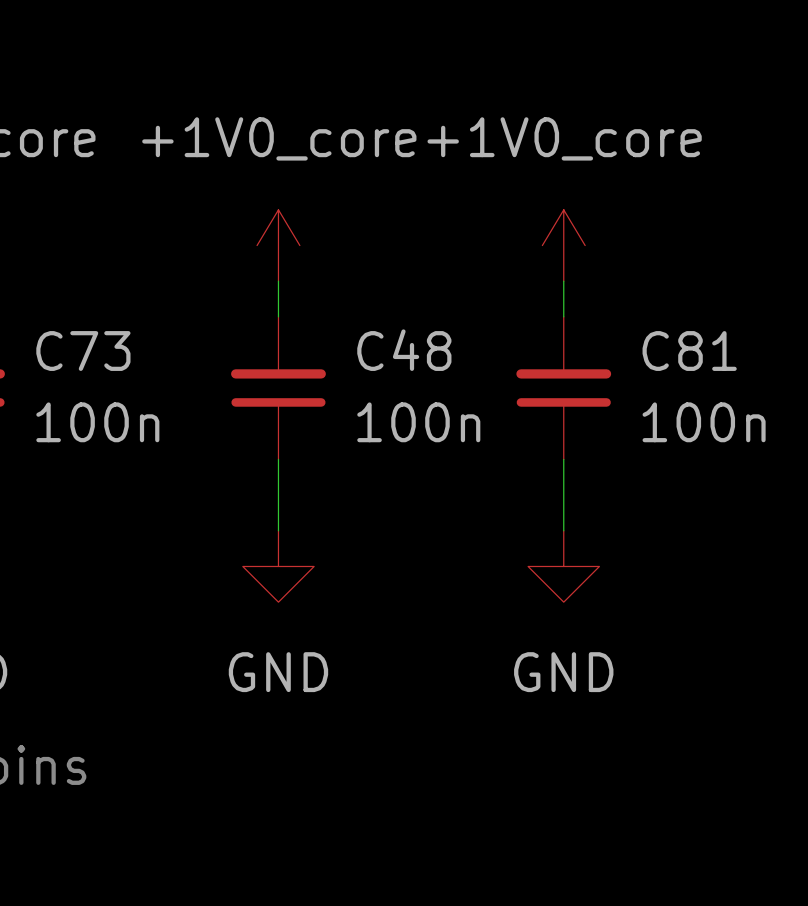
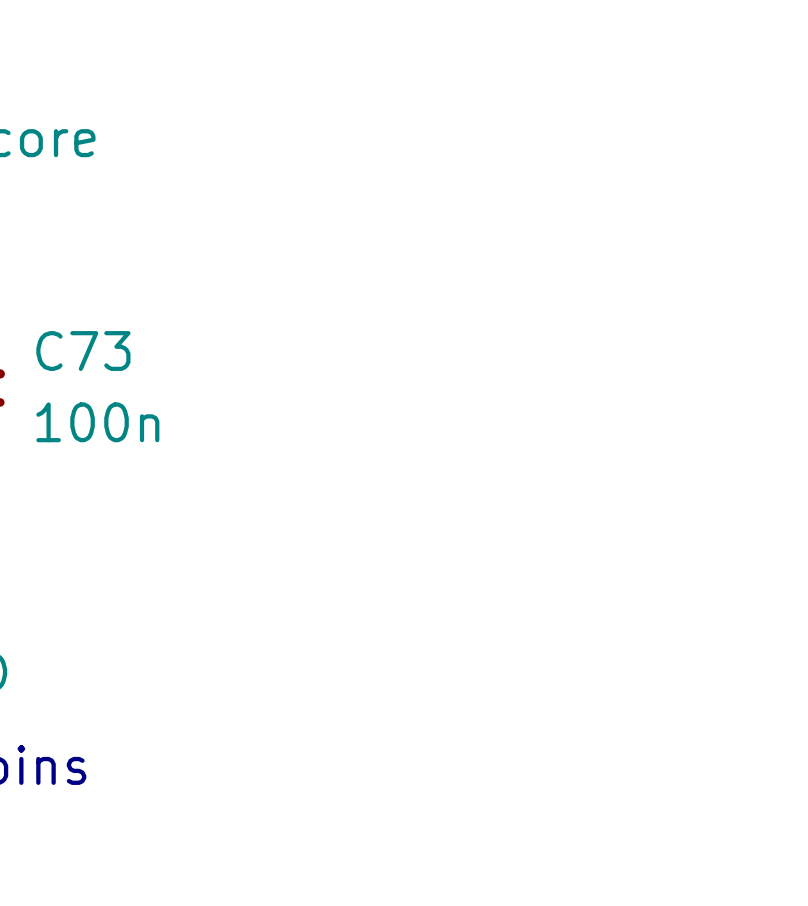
power symbol: +1V0_core (278, 245) -> none
power symbol: +1V0_core (563, 245) -> none
wire: (278, 281) (278, 316) -> none
wire: (563, 281) (563, 316) -> none
C48: (278, 388) -> none
C81: (563, 388) -> none
wire: (278, 459) (278, 530) -> none
wire: (563, 459) (563, 530) -> none
power symbol: GND (278, 566) -> none
power symbol: GND (563, 566) -> none

